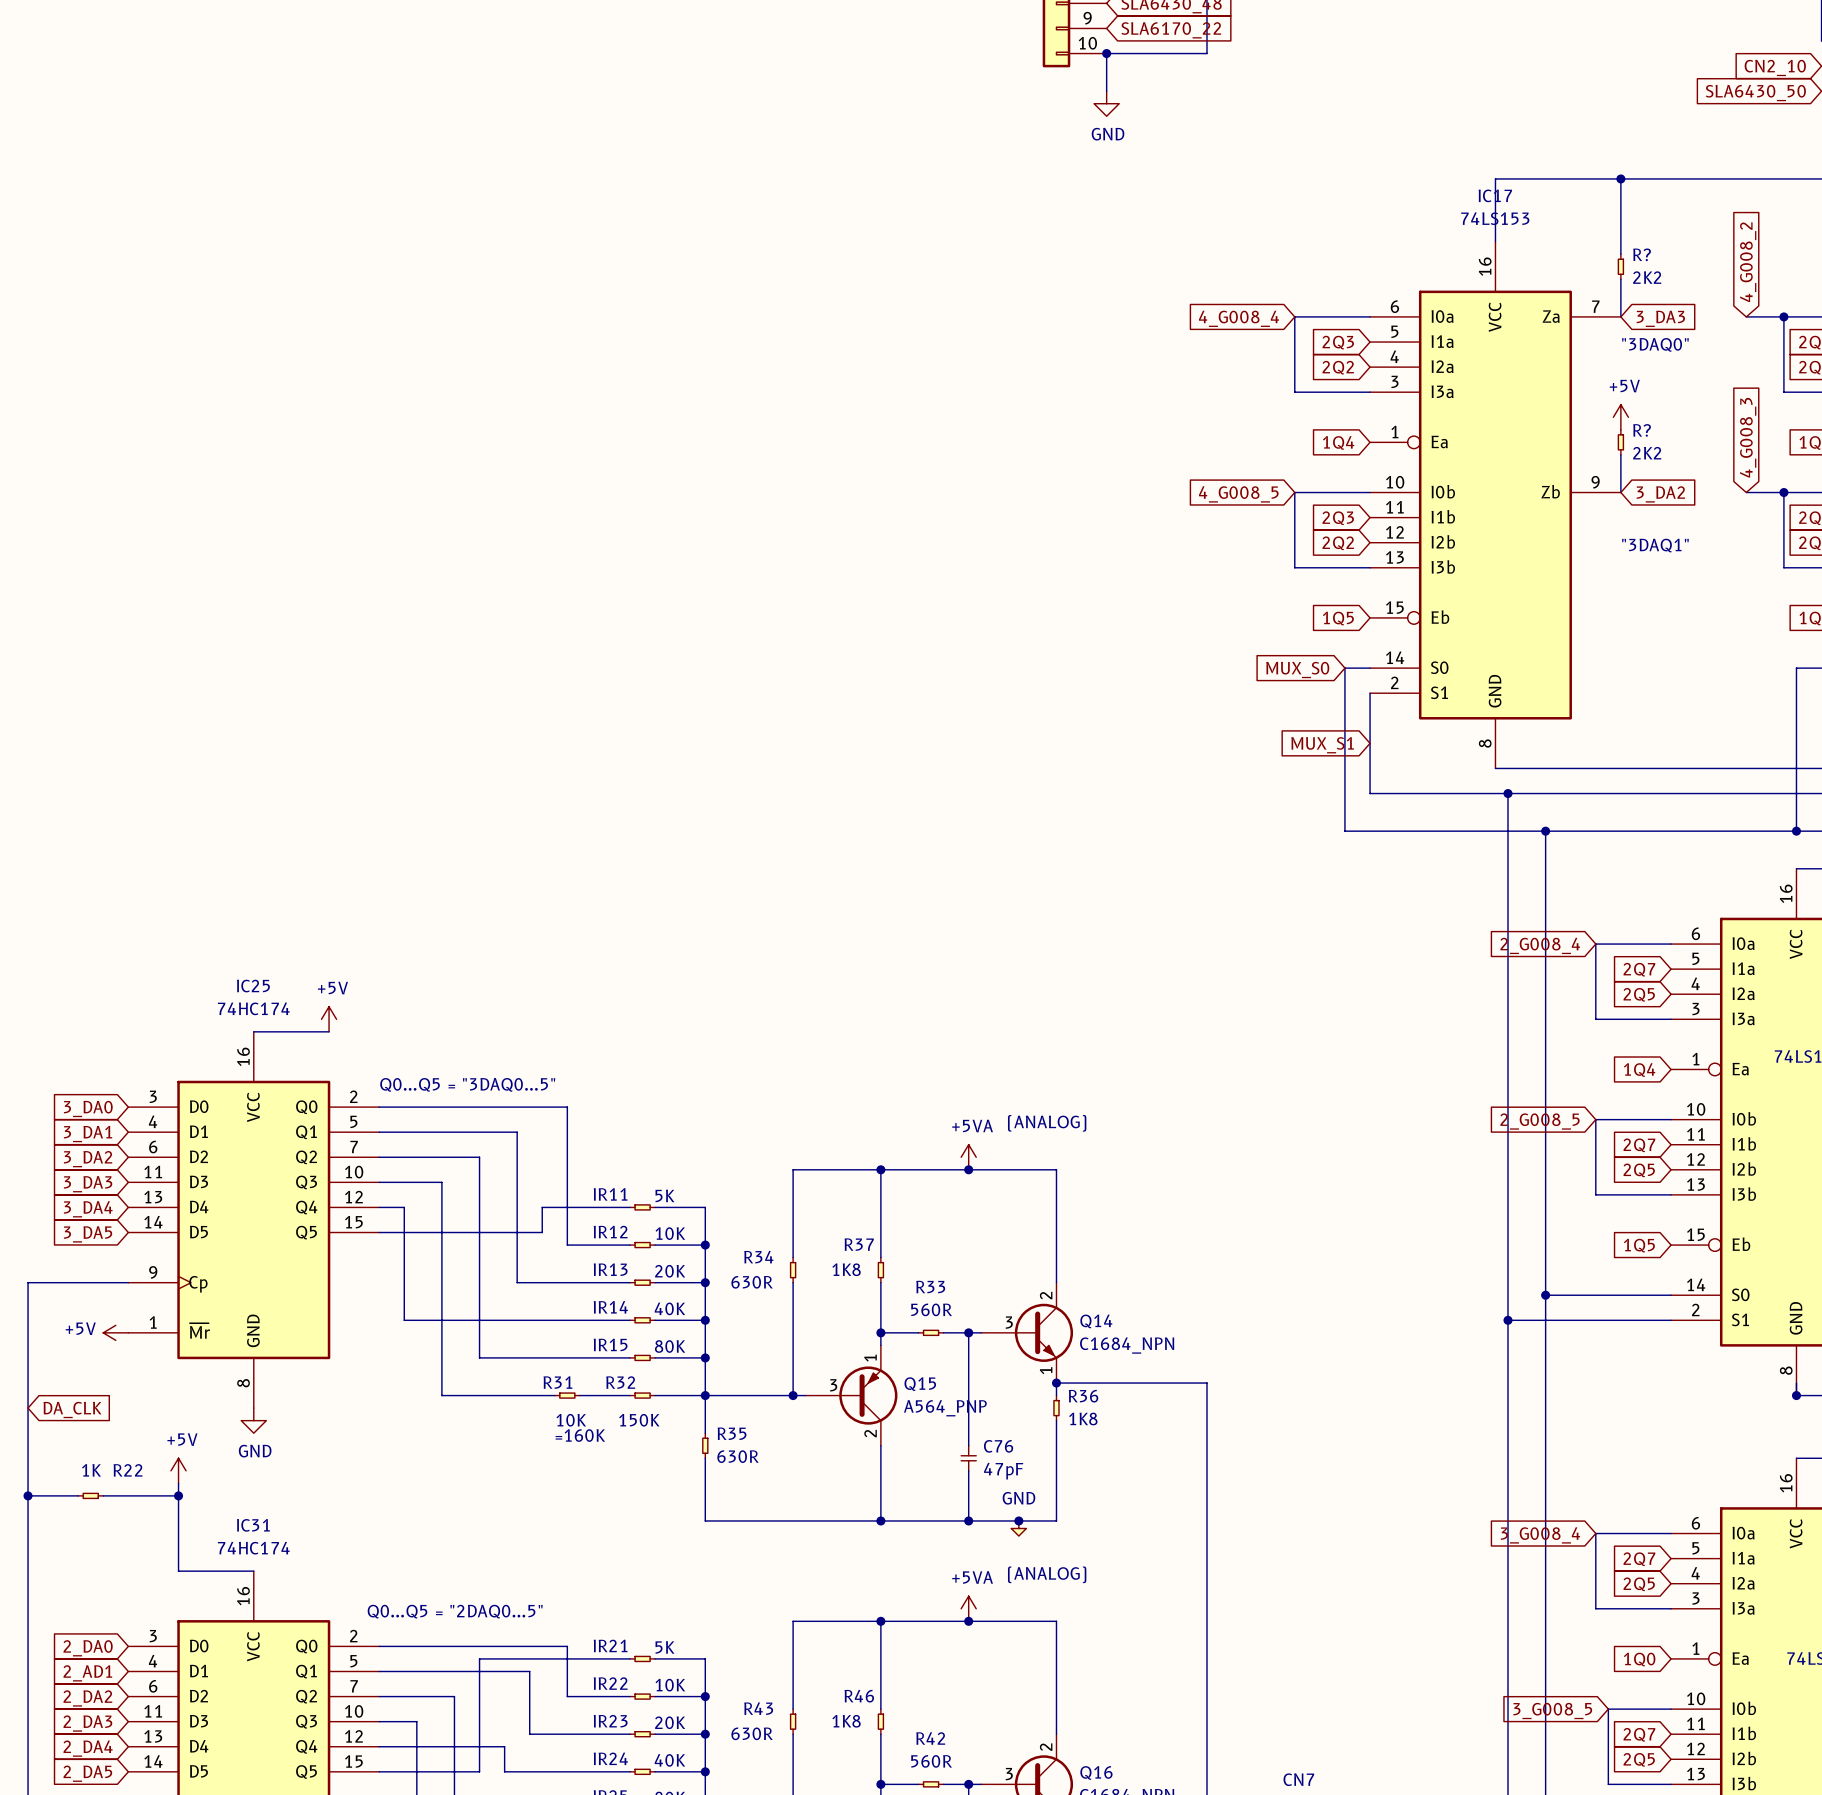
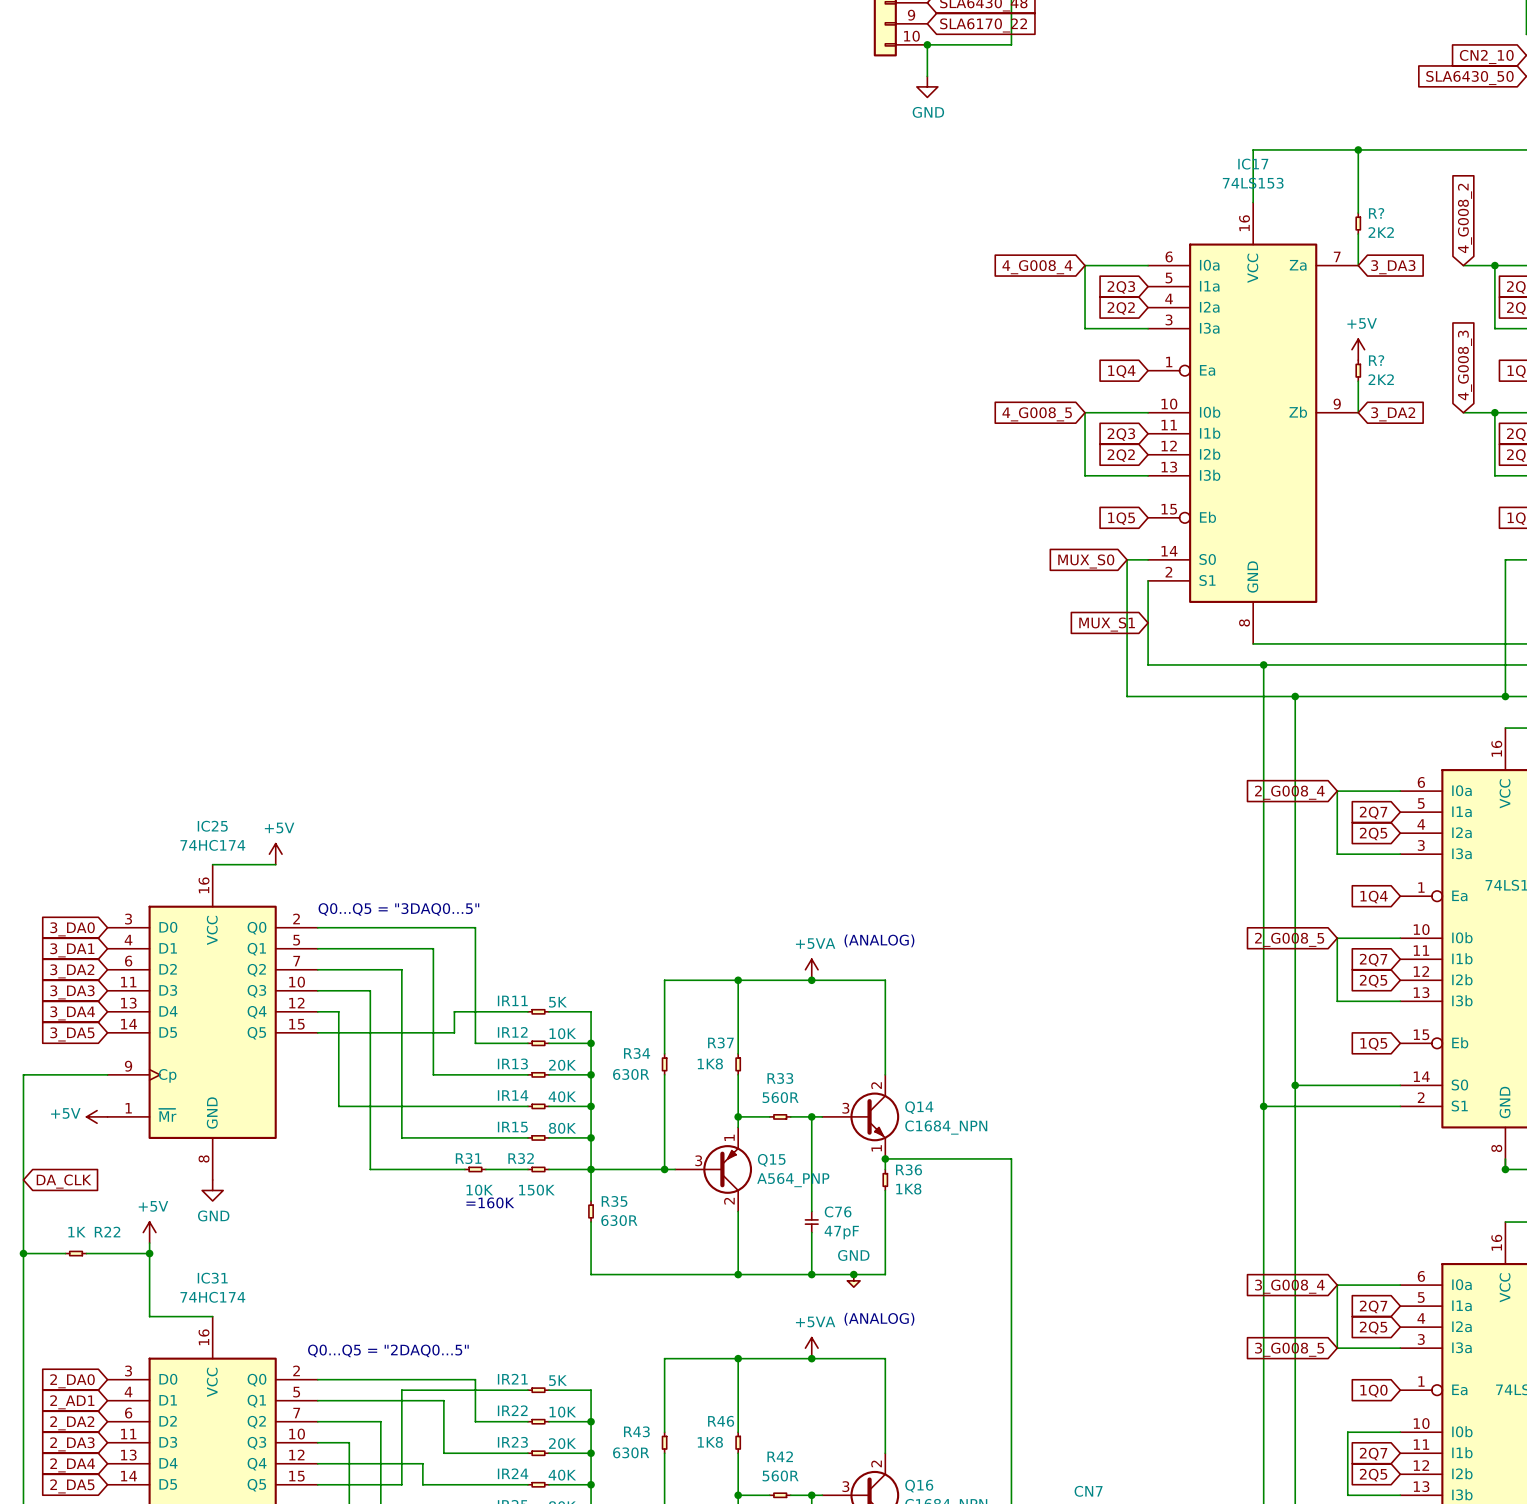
text: "3DAQ0" (1655, 344) -> none
text: "3DAQ1" (1655, 545) -> none
global label position: 3_G008_5 (1552, 1711) -> 3_G008_5 (1289, 1349)

